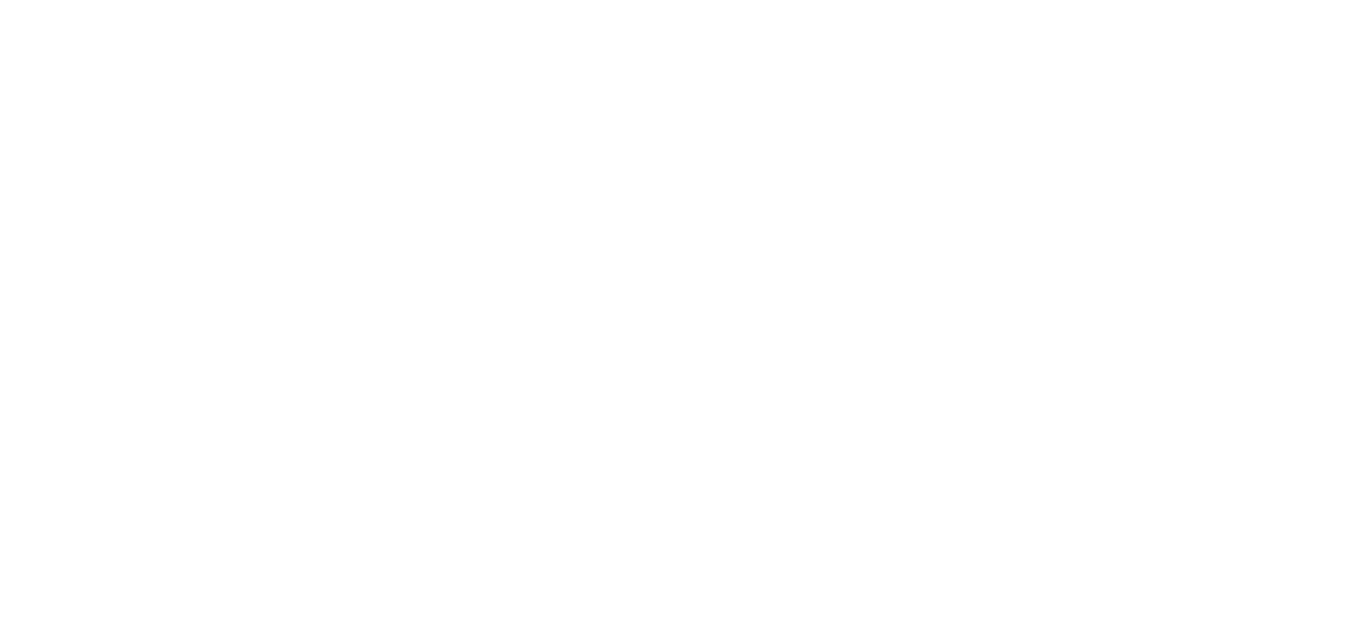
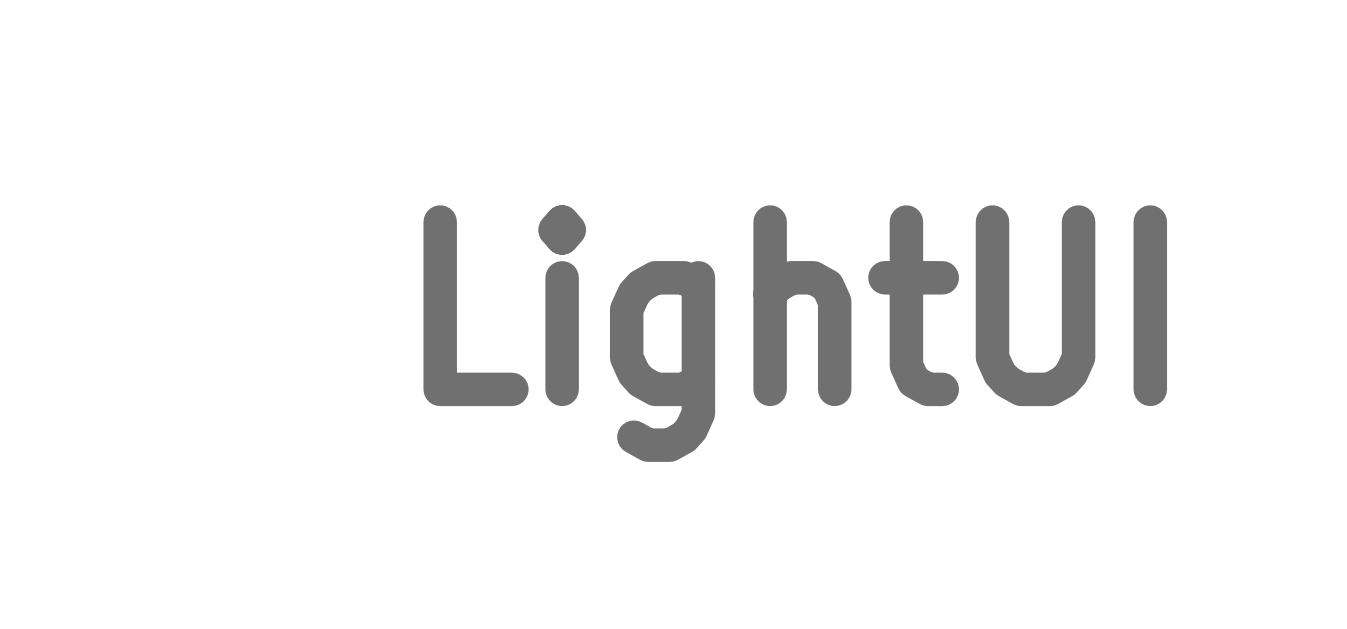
text: none -> LightUI (795, 333)

